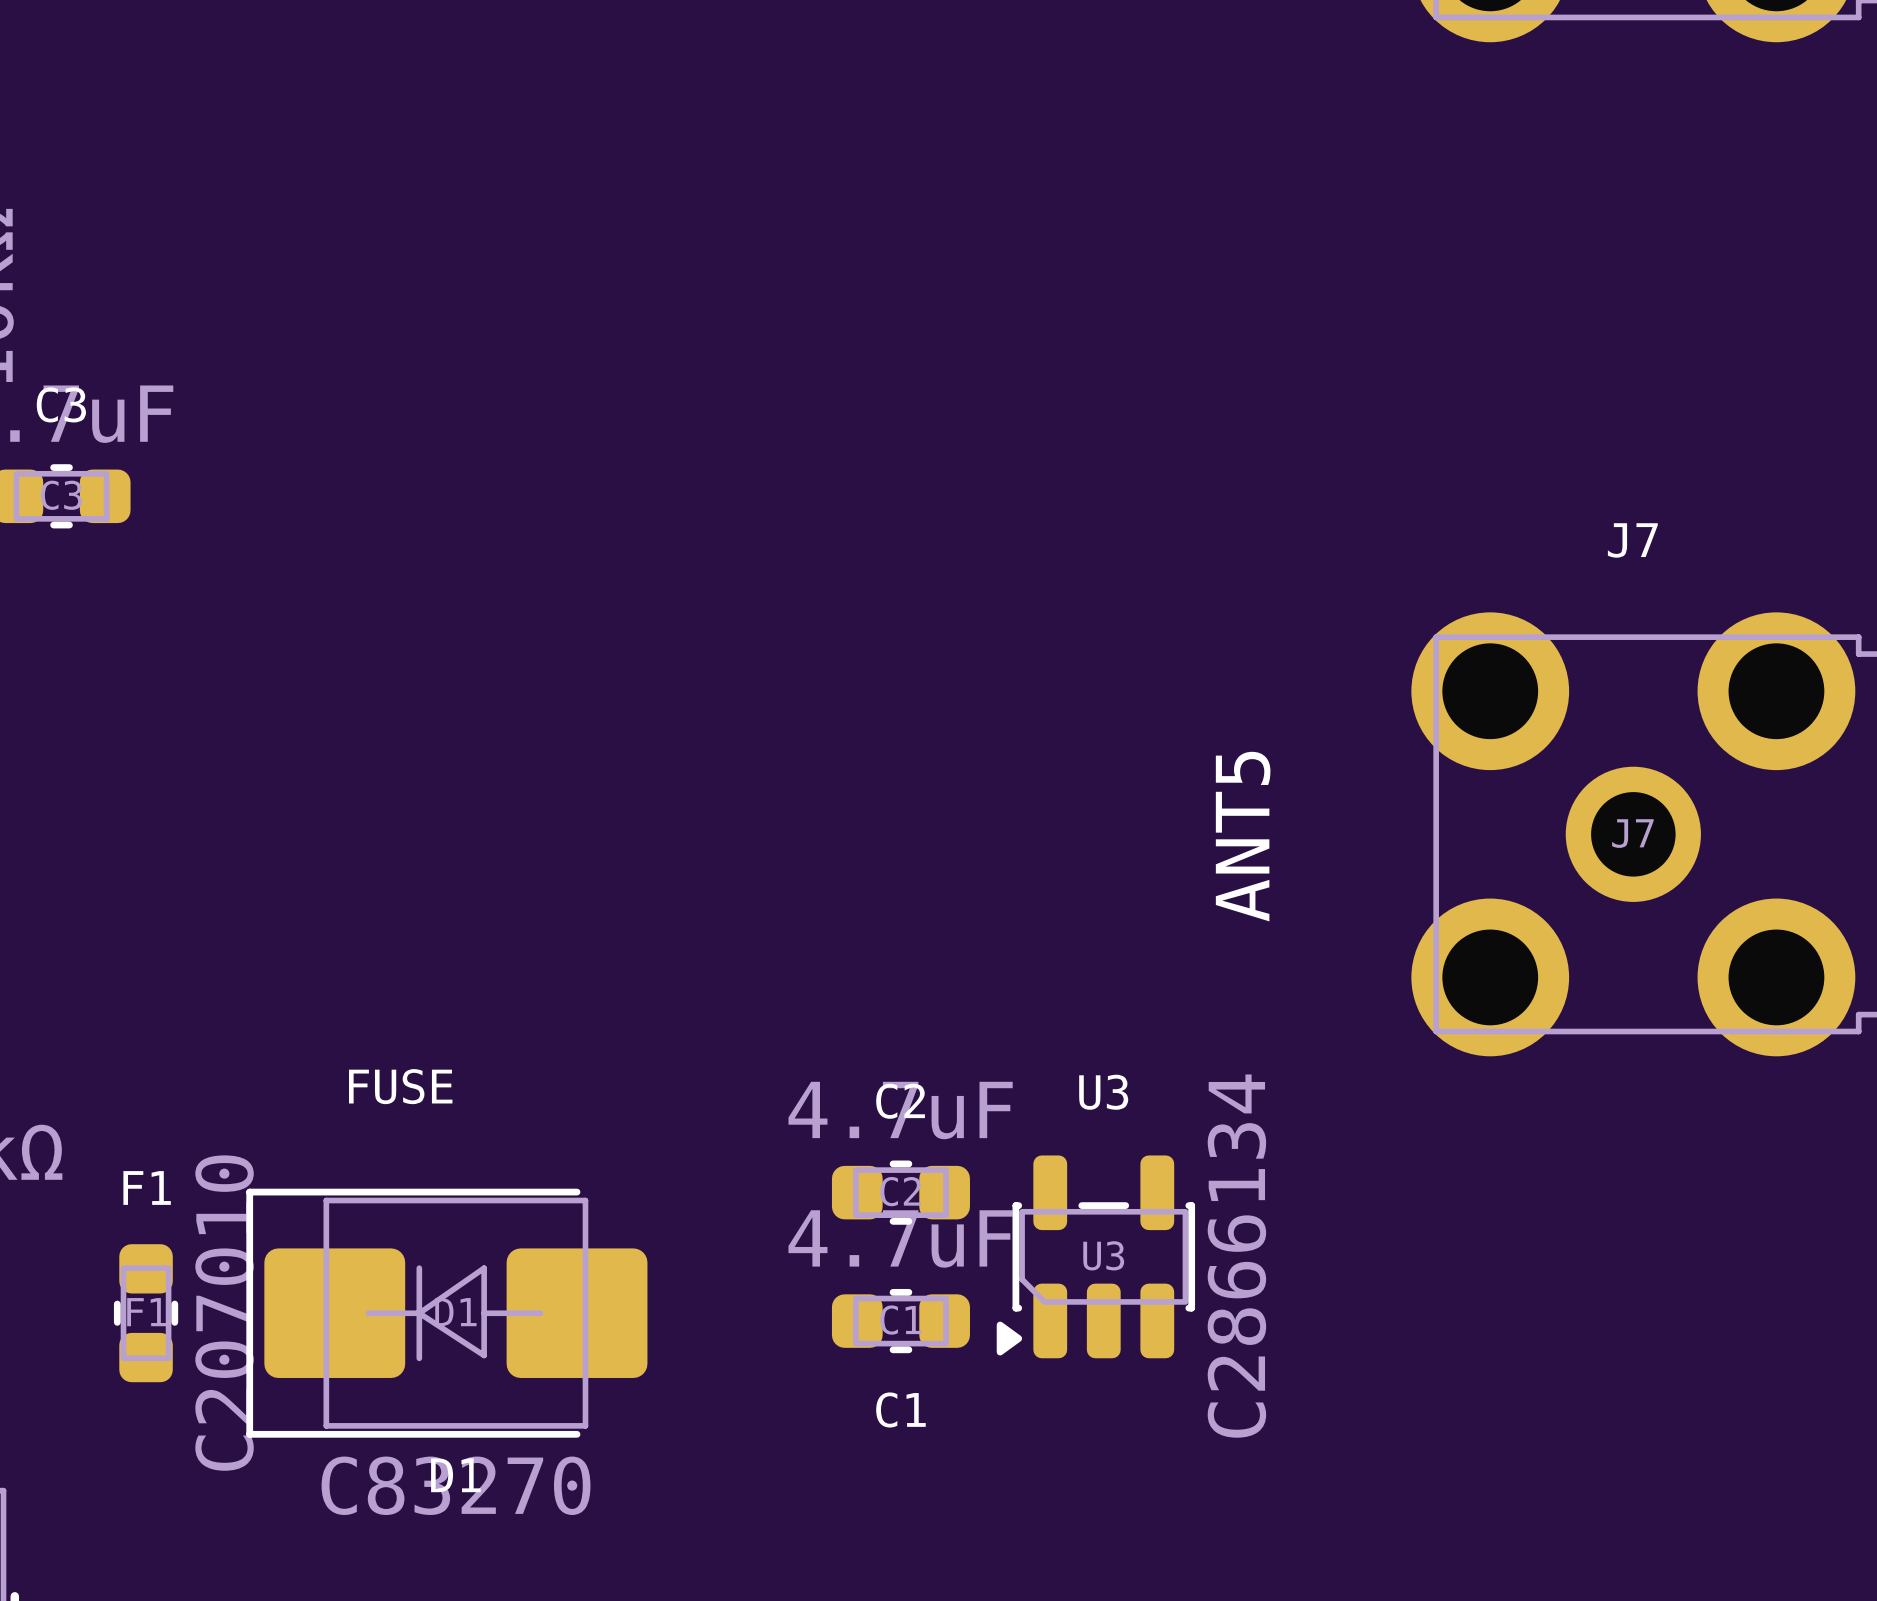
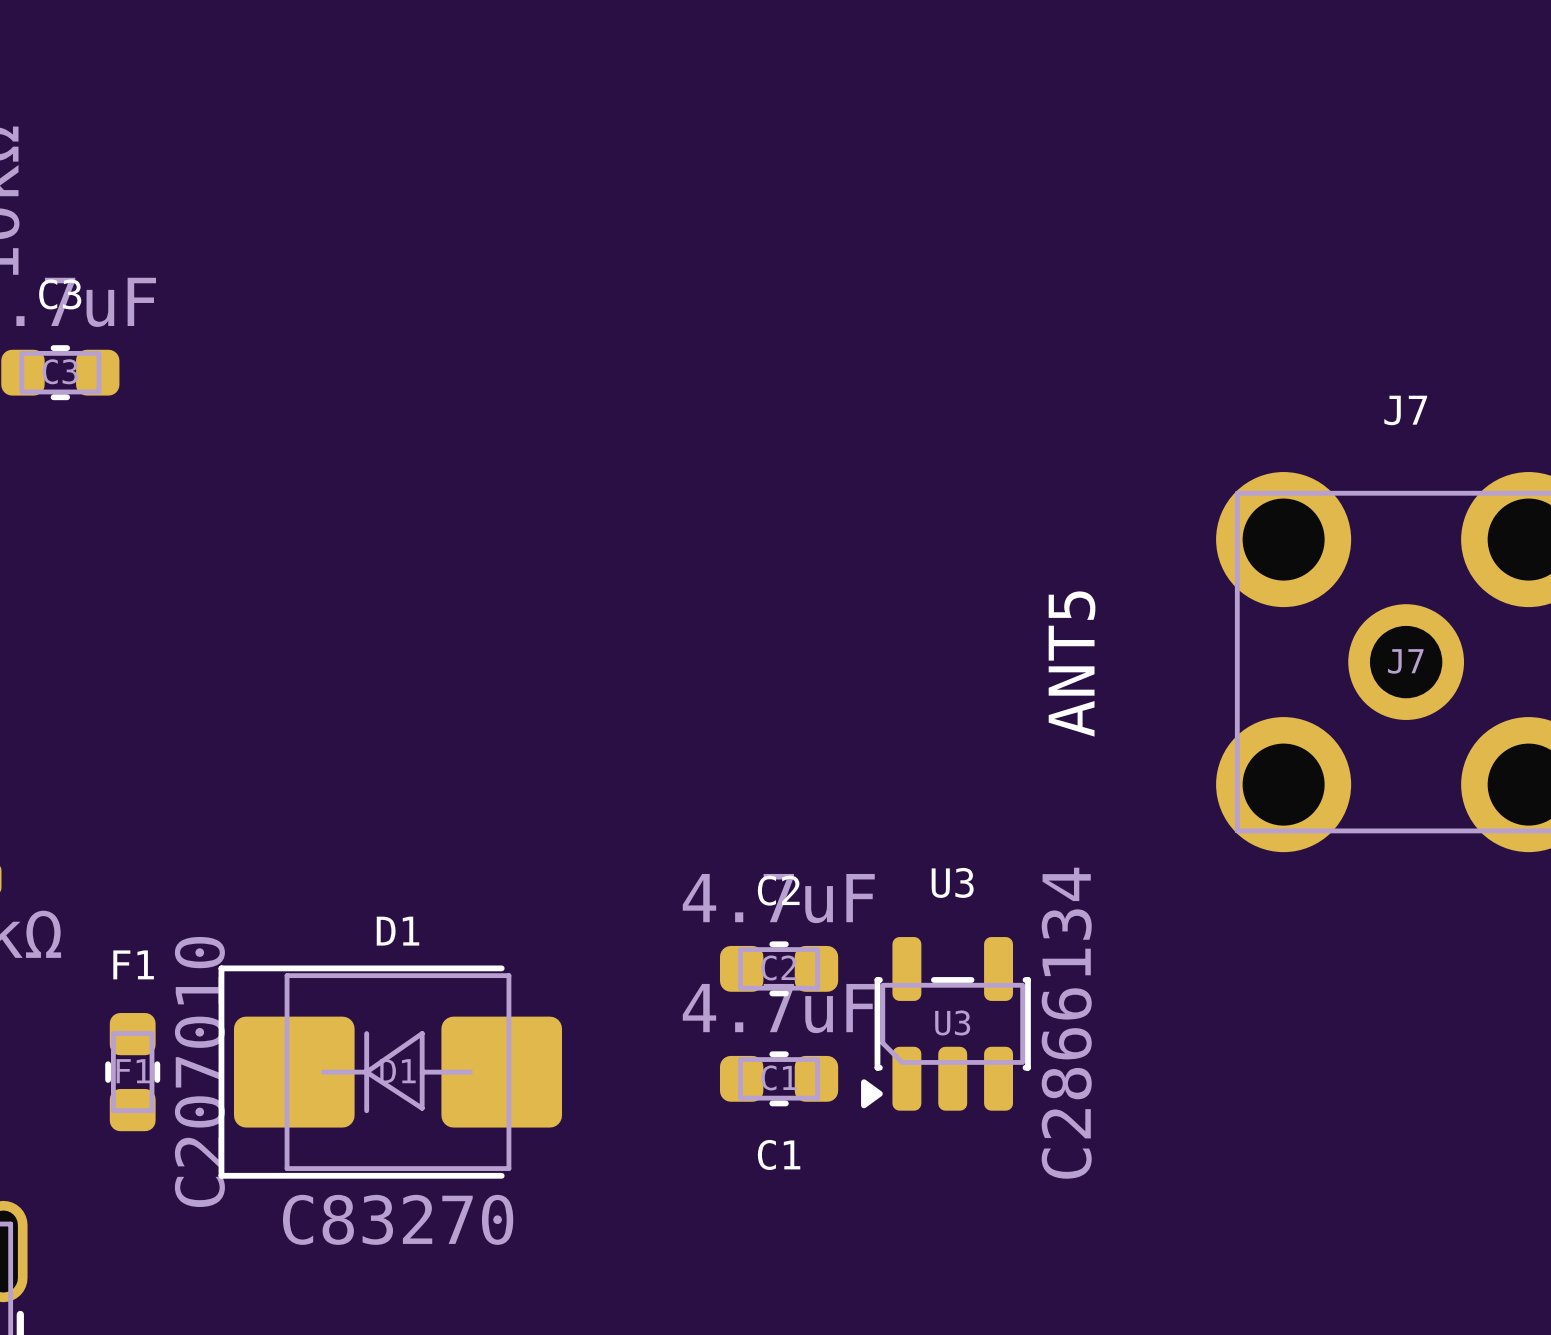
text: FUSE (400, 1086) -> none
D1 name position: D1 (455, 1475) -> D1 (397, 931)

